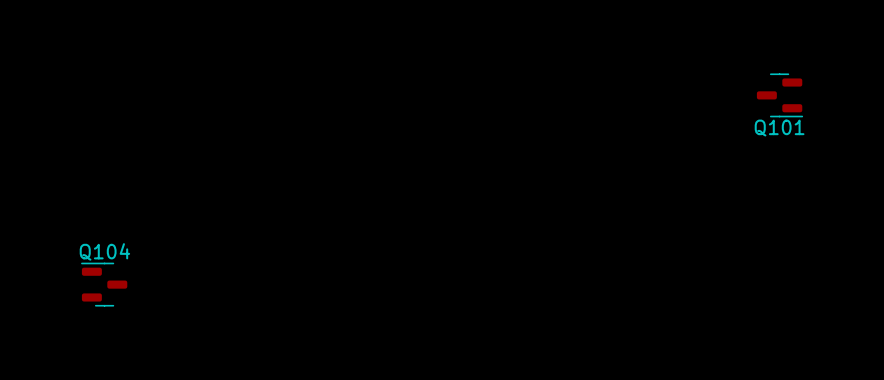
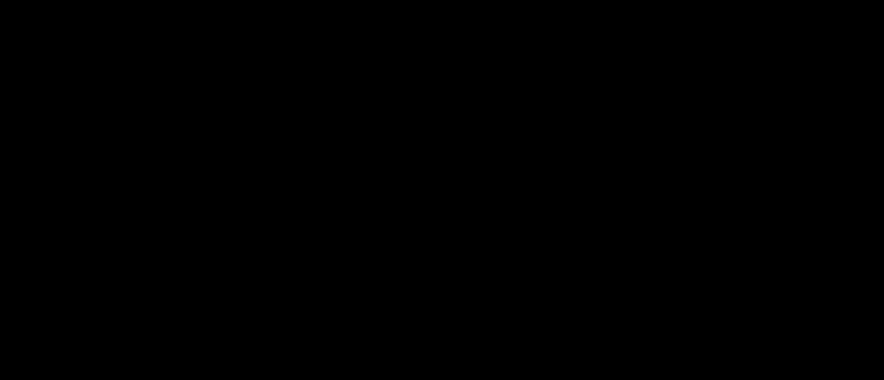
Q101: (779, 95) -> none
Q104: (104, 284) -> none

